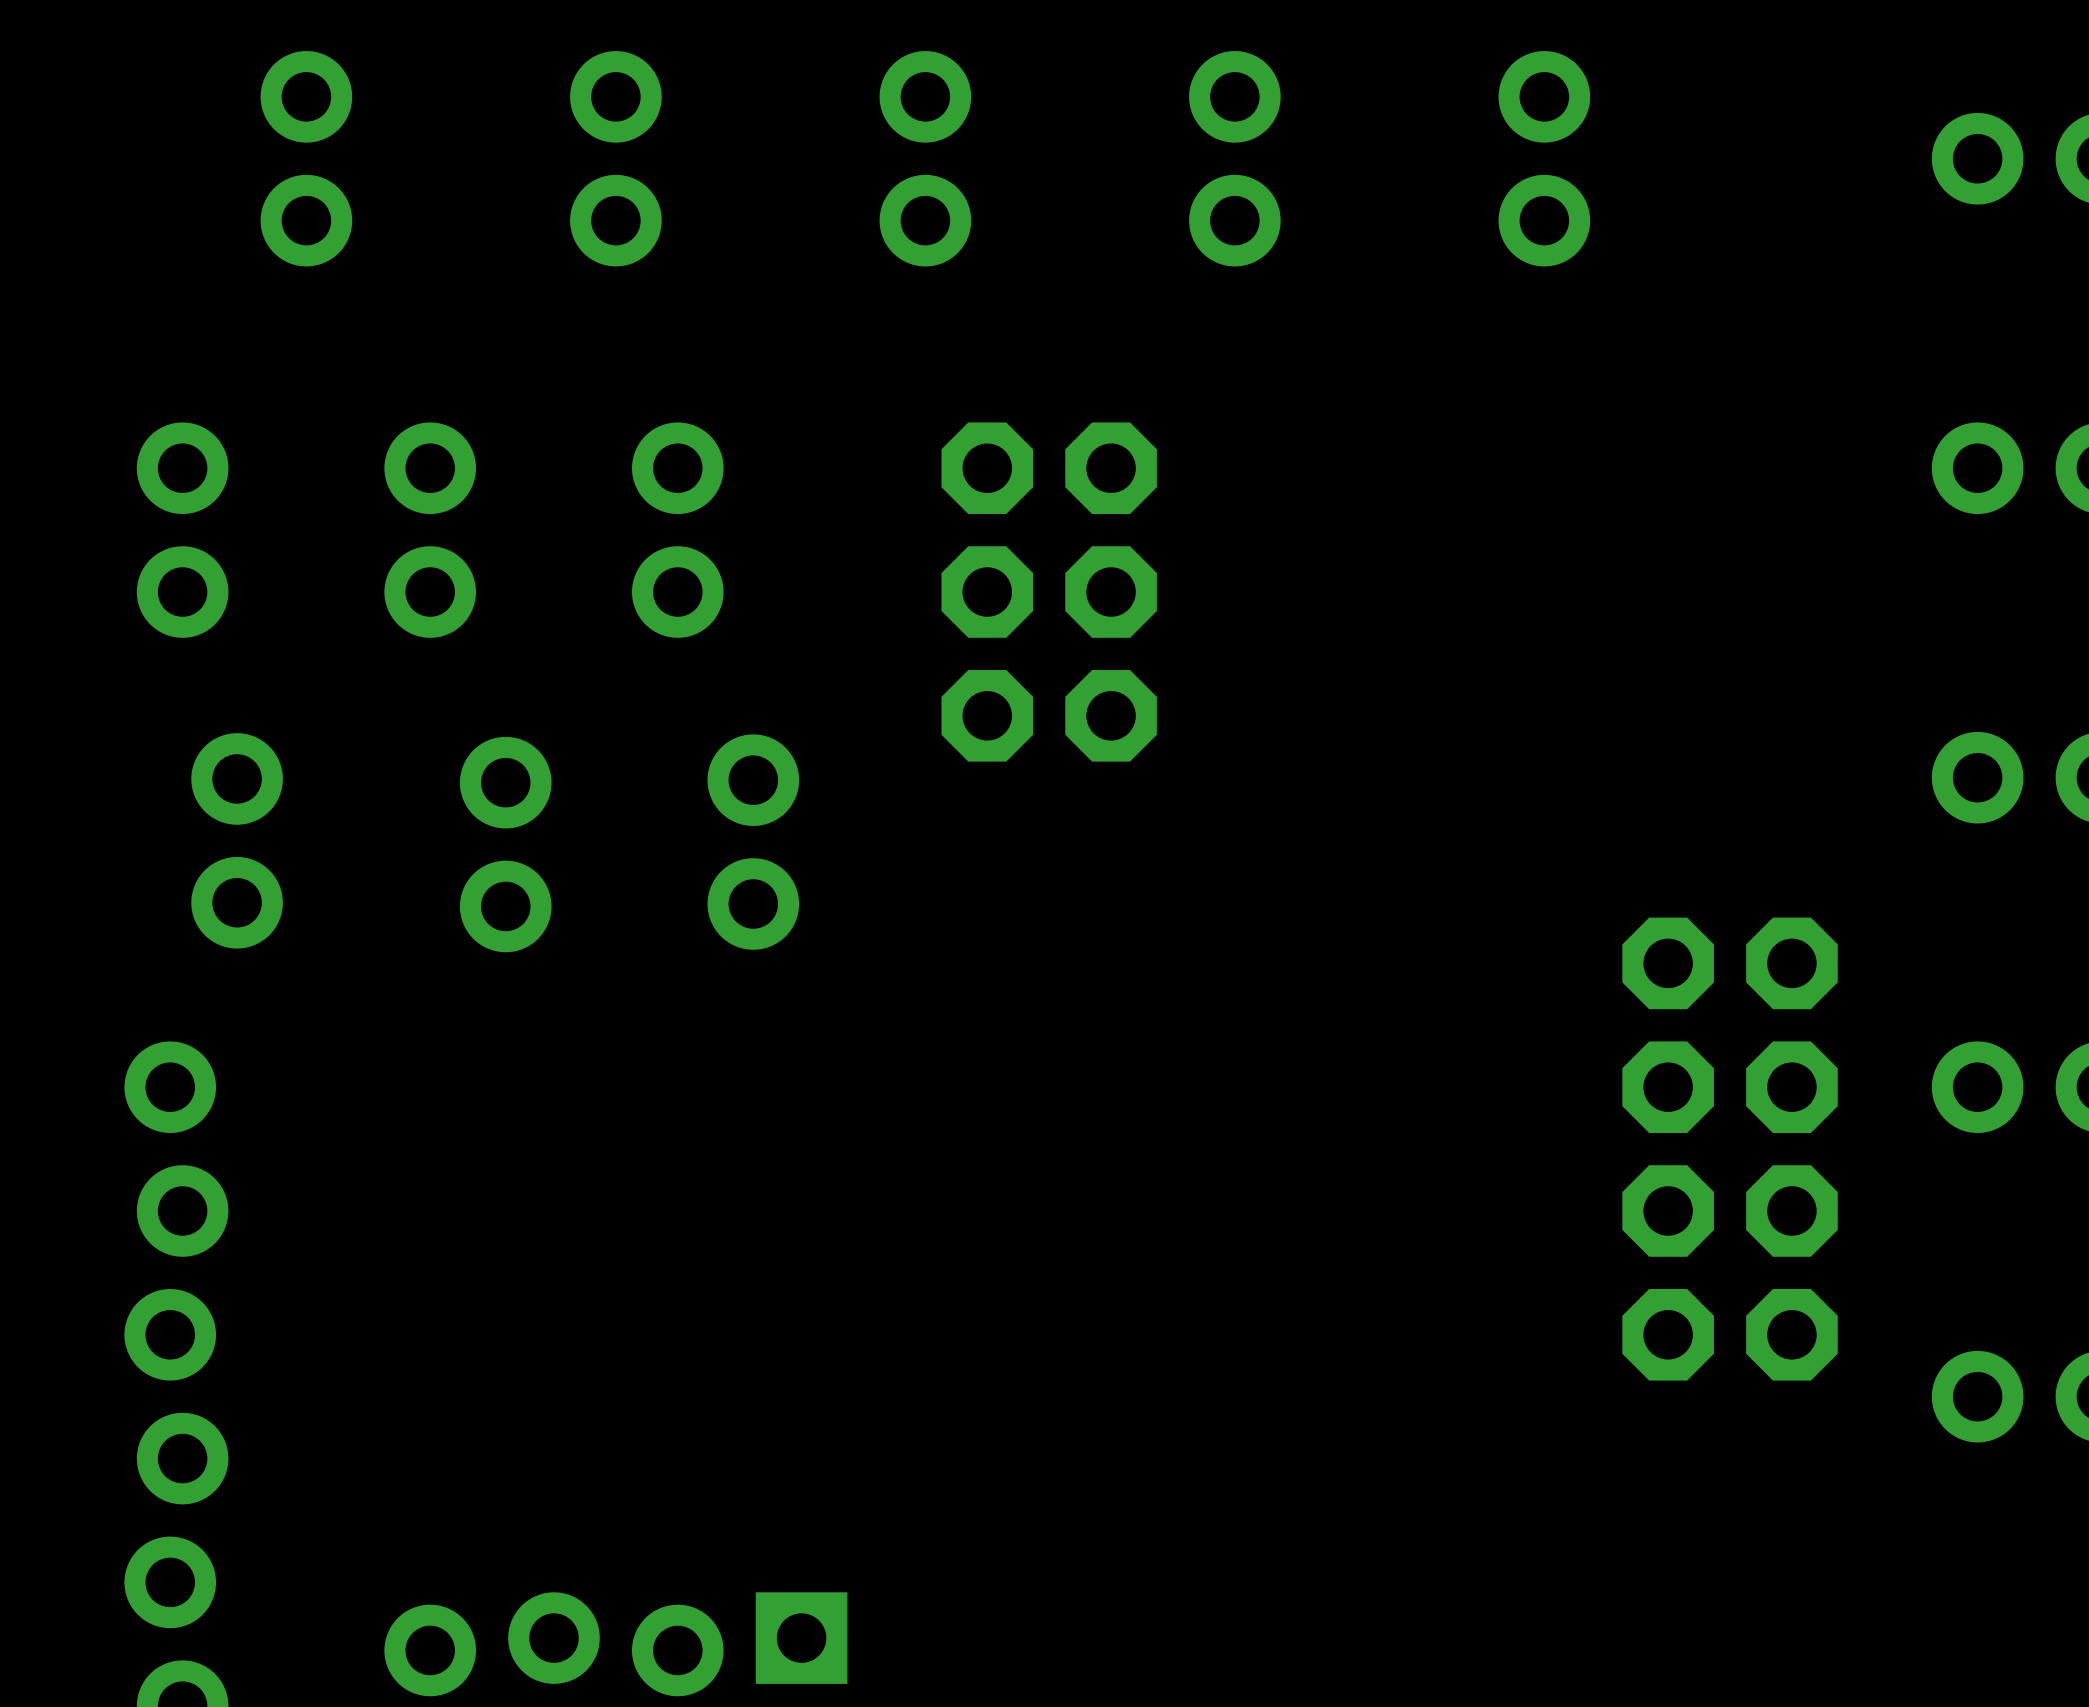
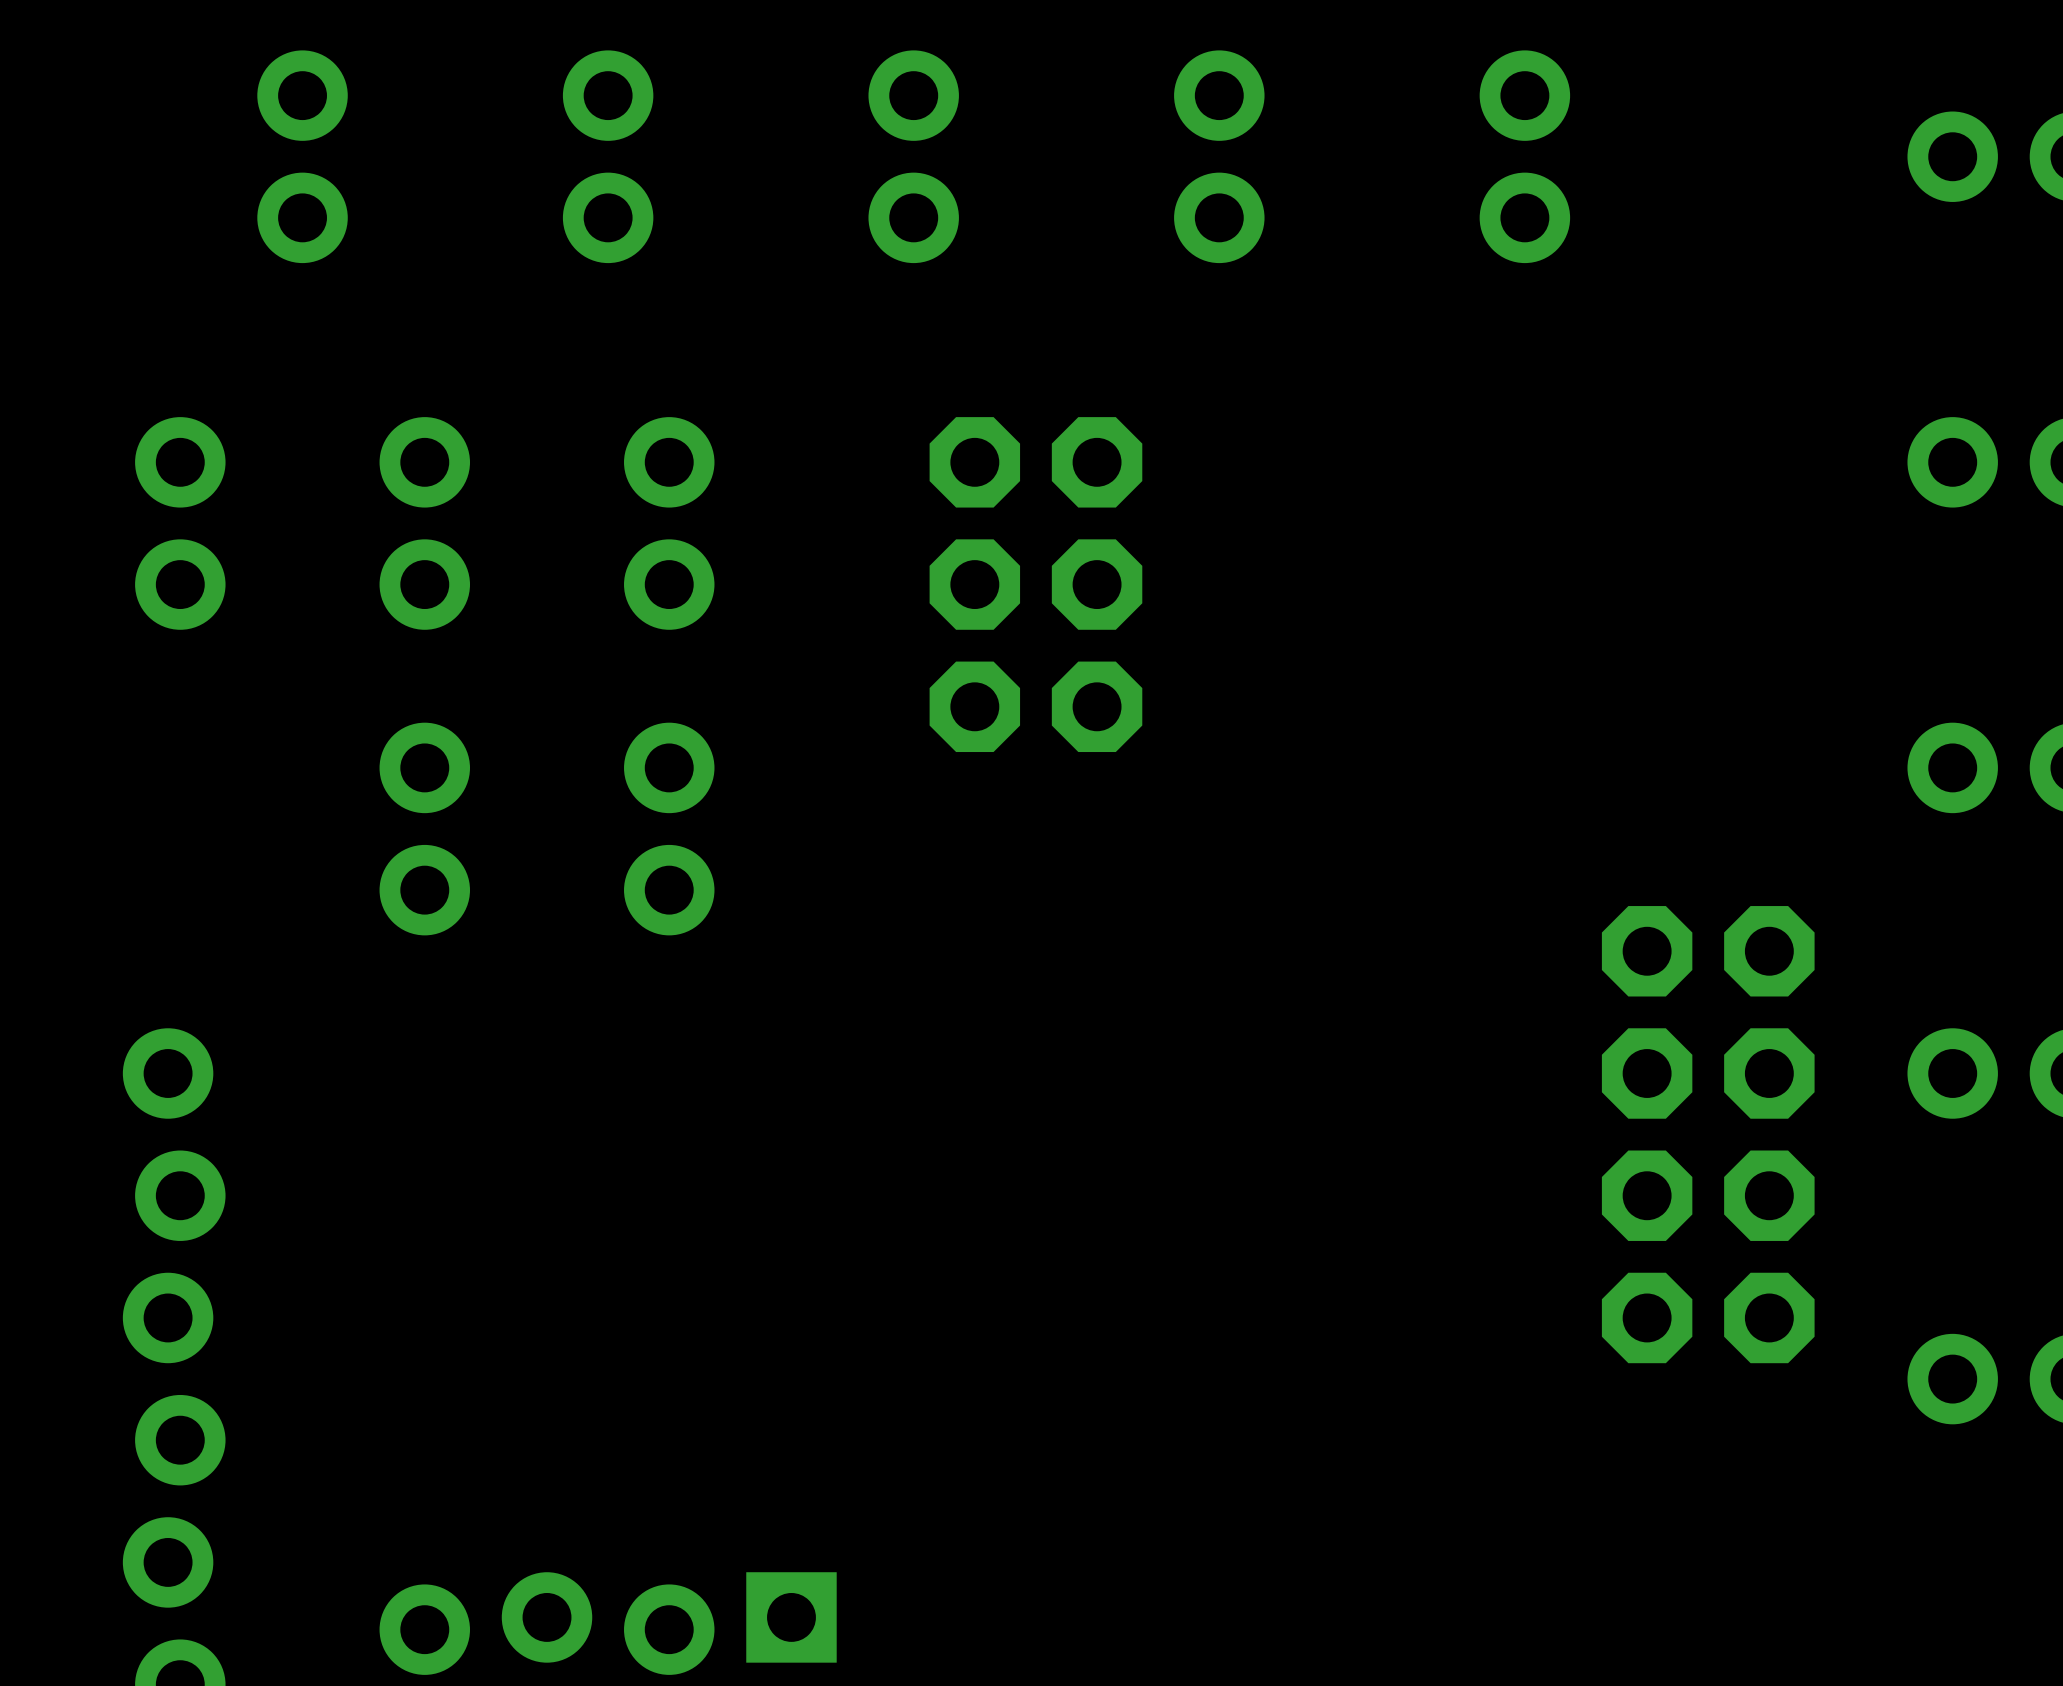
part: (237, 840) -> none
part position: (753, 842) -> (669, 829)
part position: (505, 844) -> (424, 829)

